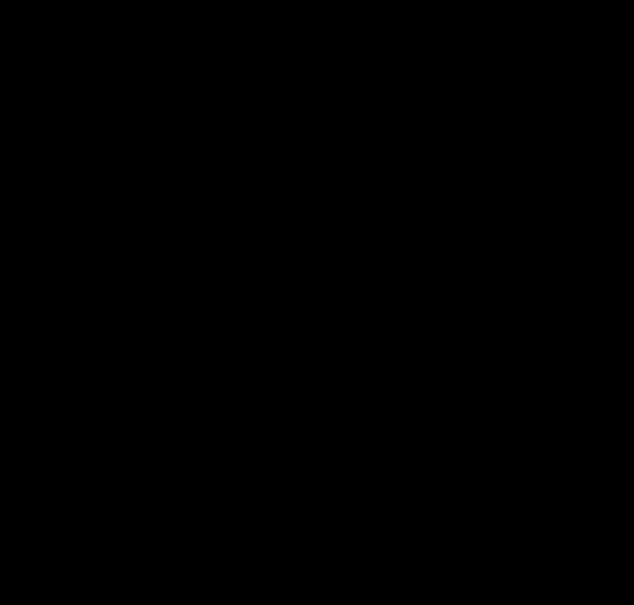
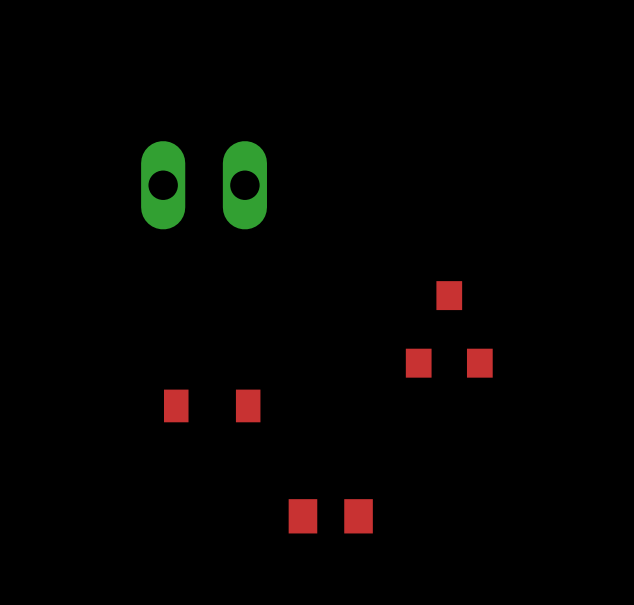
part: none -> (204, 185)
part: none -> (449, 329)
part: none -> (212, 405)
part: none -> (330, 516)

